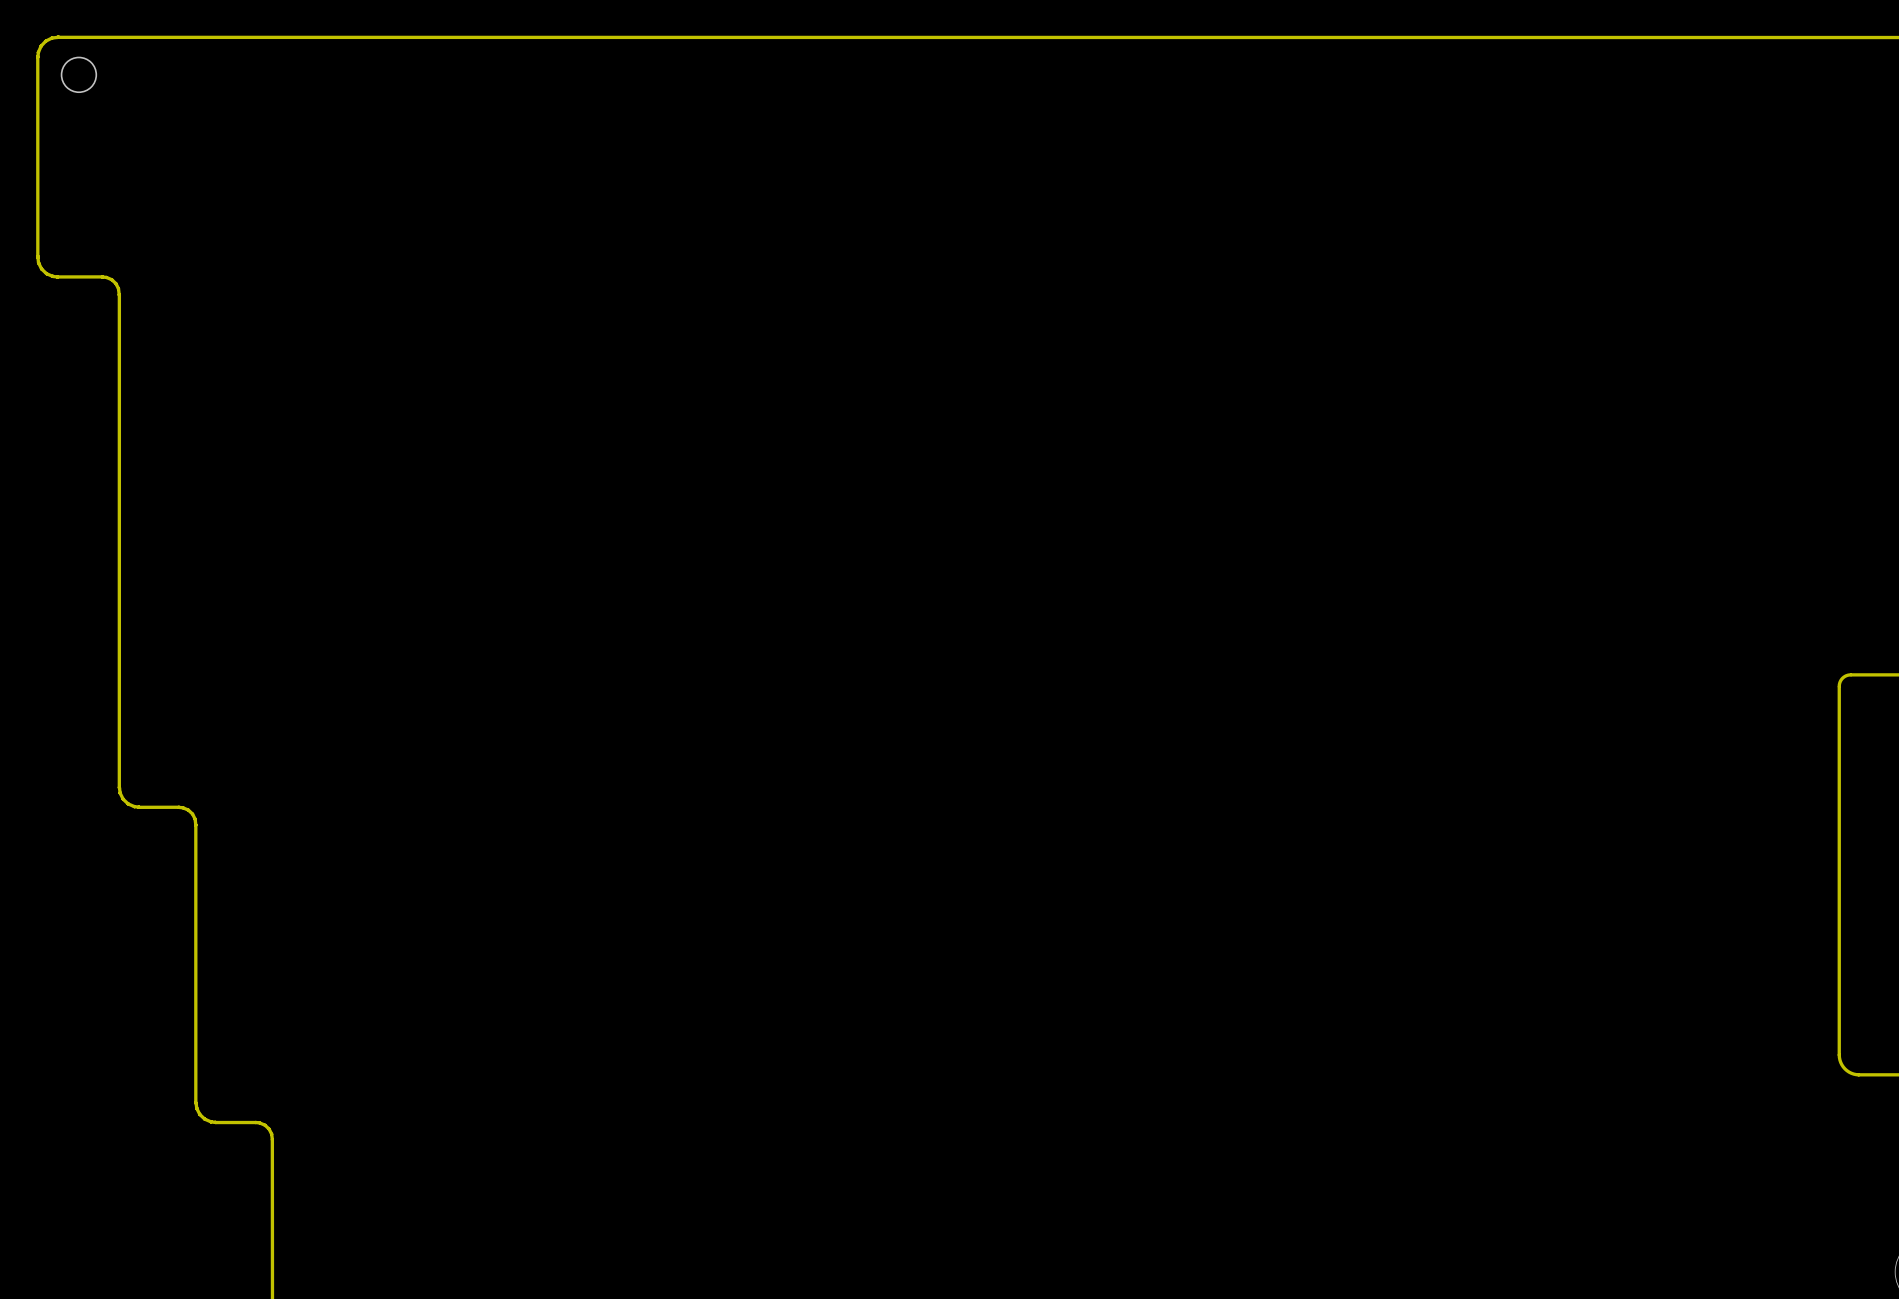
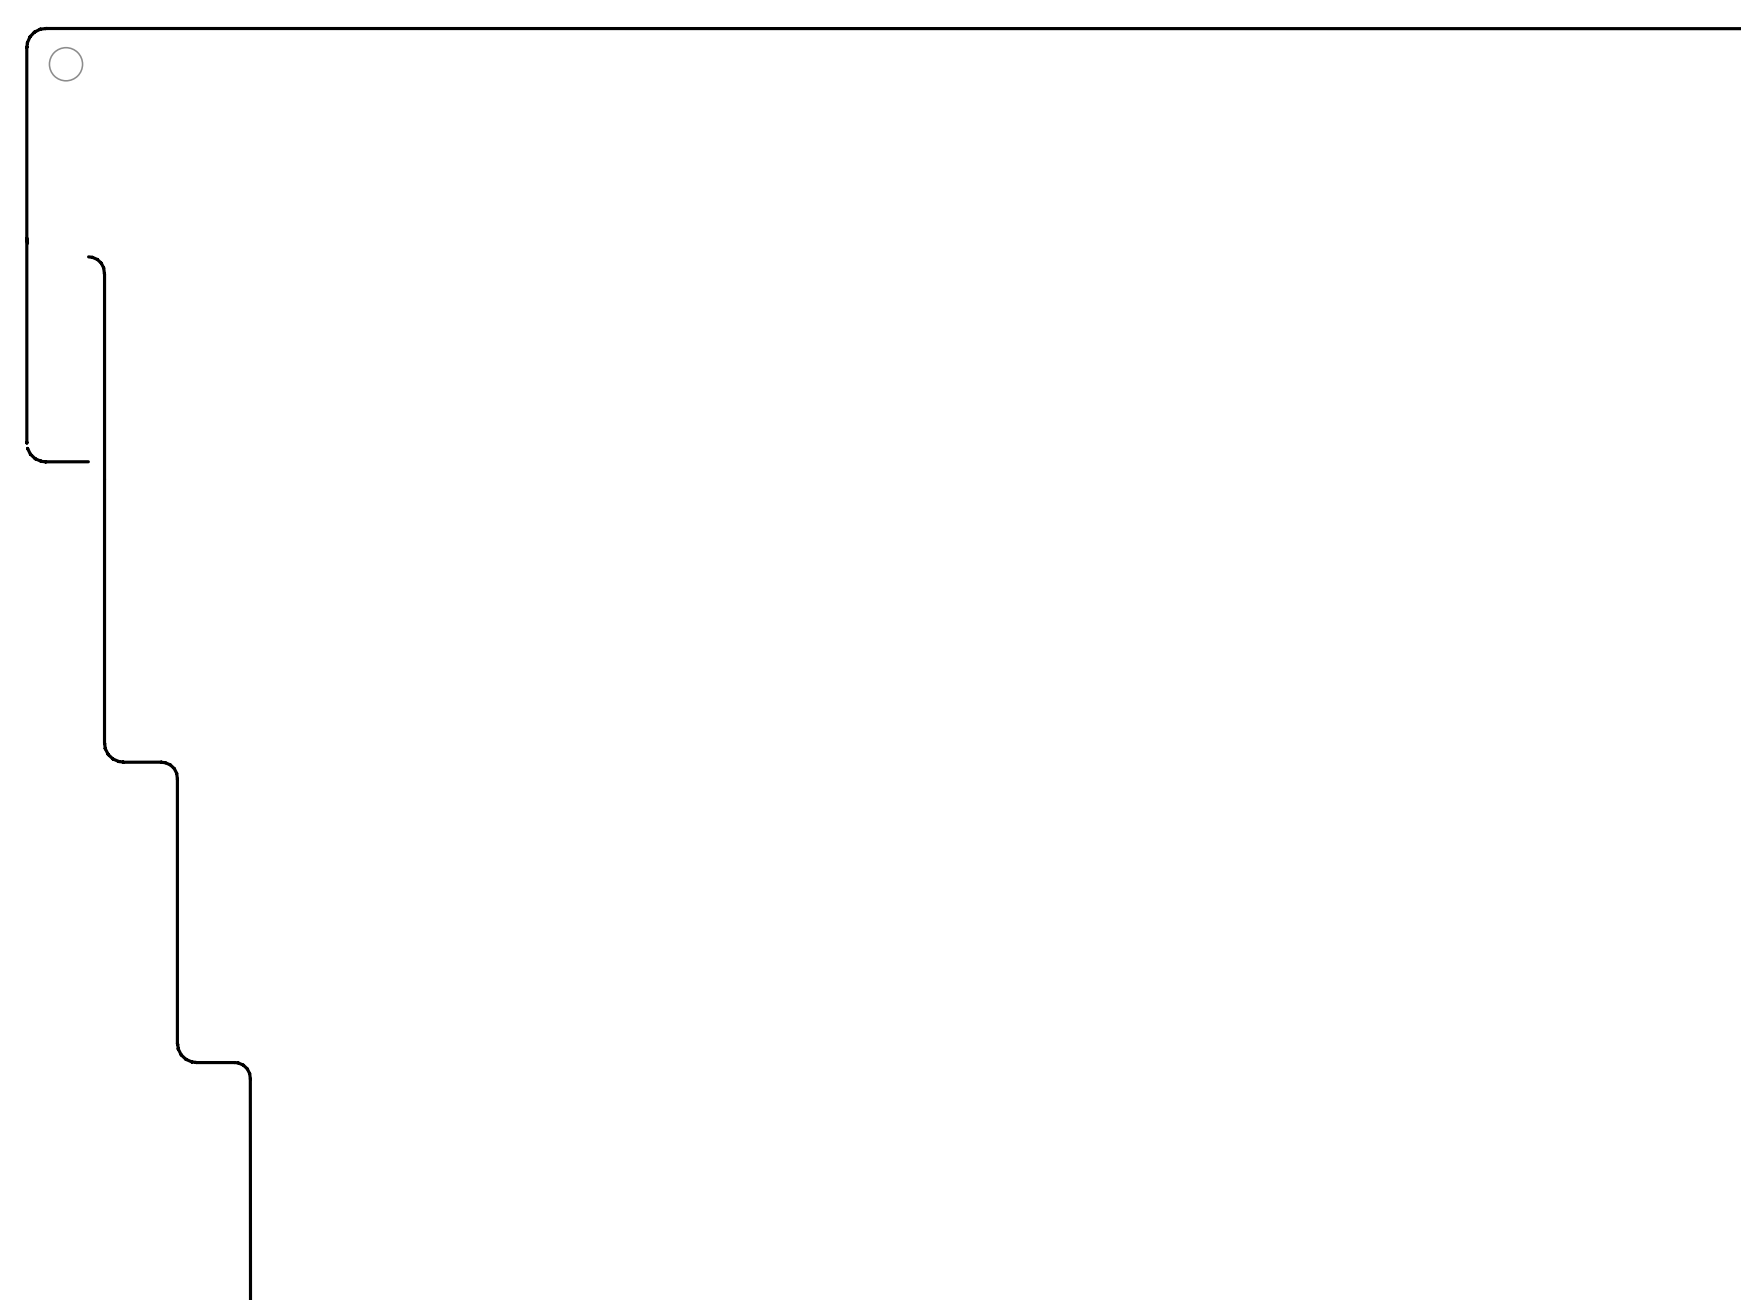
board edge: (37, 57) (37, 257) -> (26, 47) (26, 443)
board edge: (38, 262) (41, 269) (52, 276) -> (27, 448) (30, 454) (40, 461)
board edge: (53, 276) (57, 276) -> (41, 461) (45, 461)
board edge: (102, 276) (57, 276) -> (88, 461) (45, 461)

